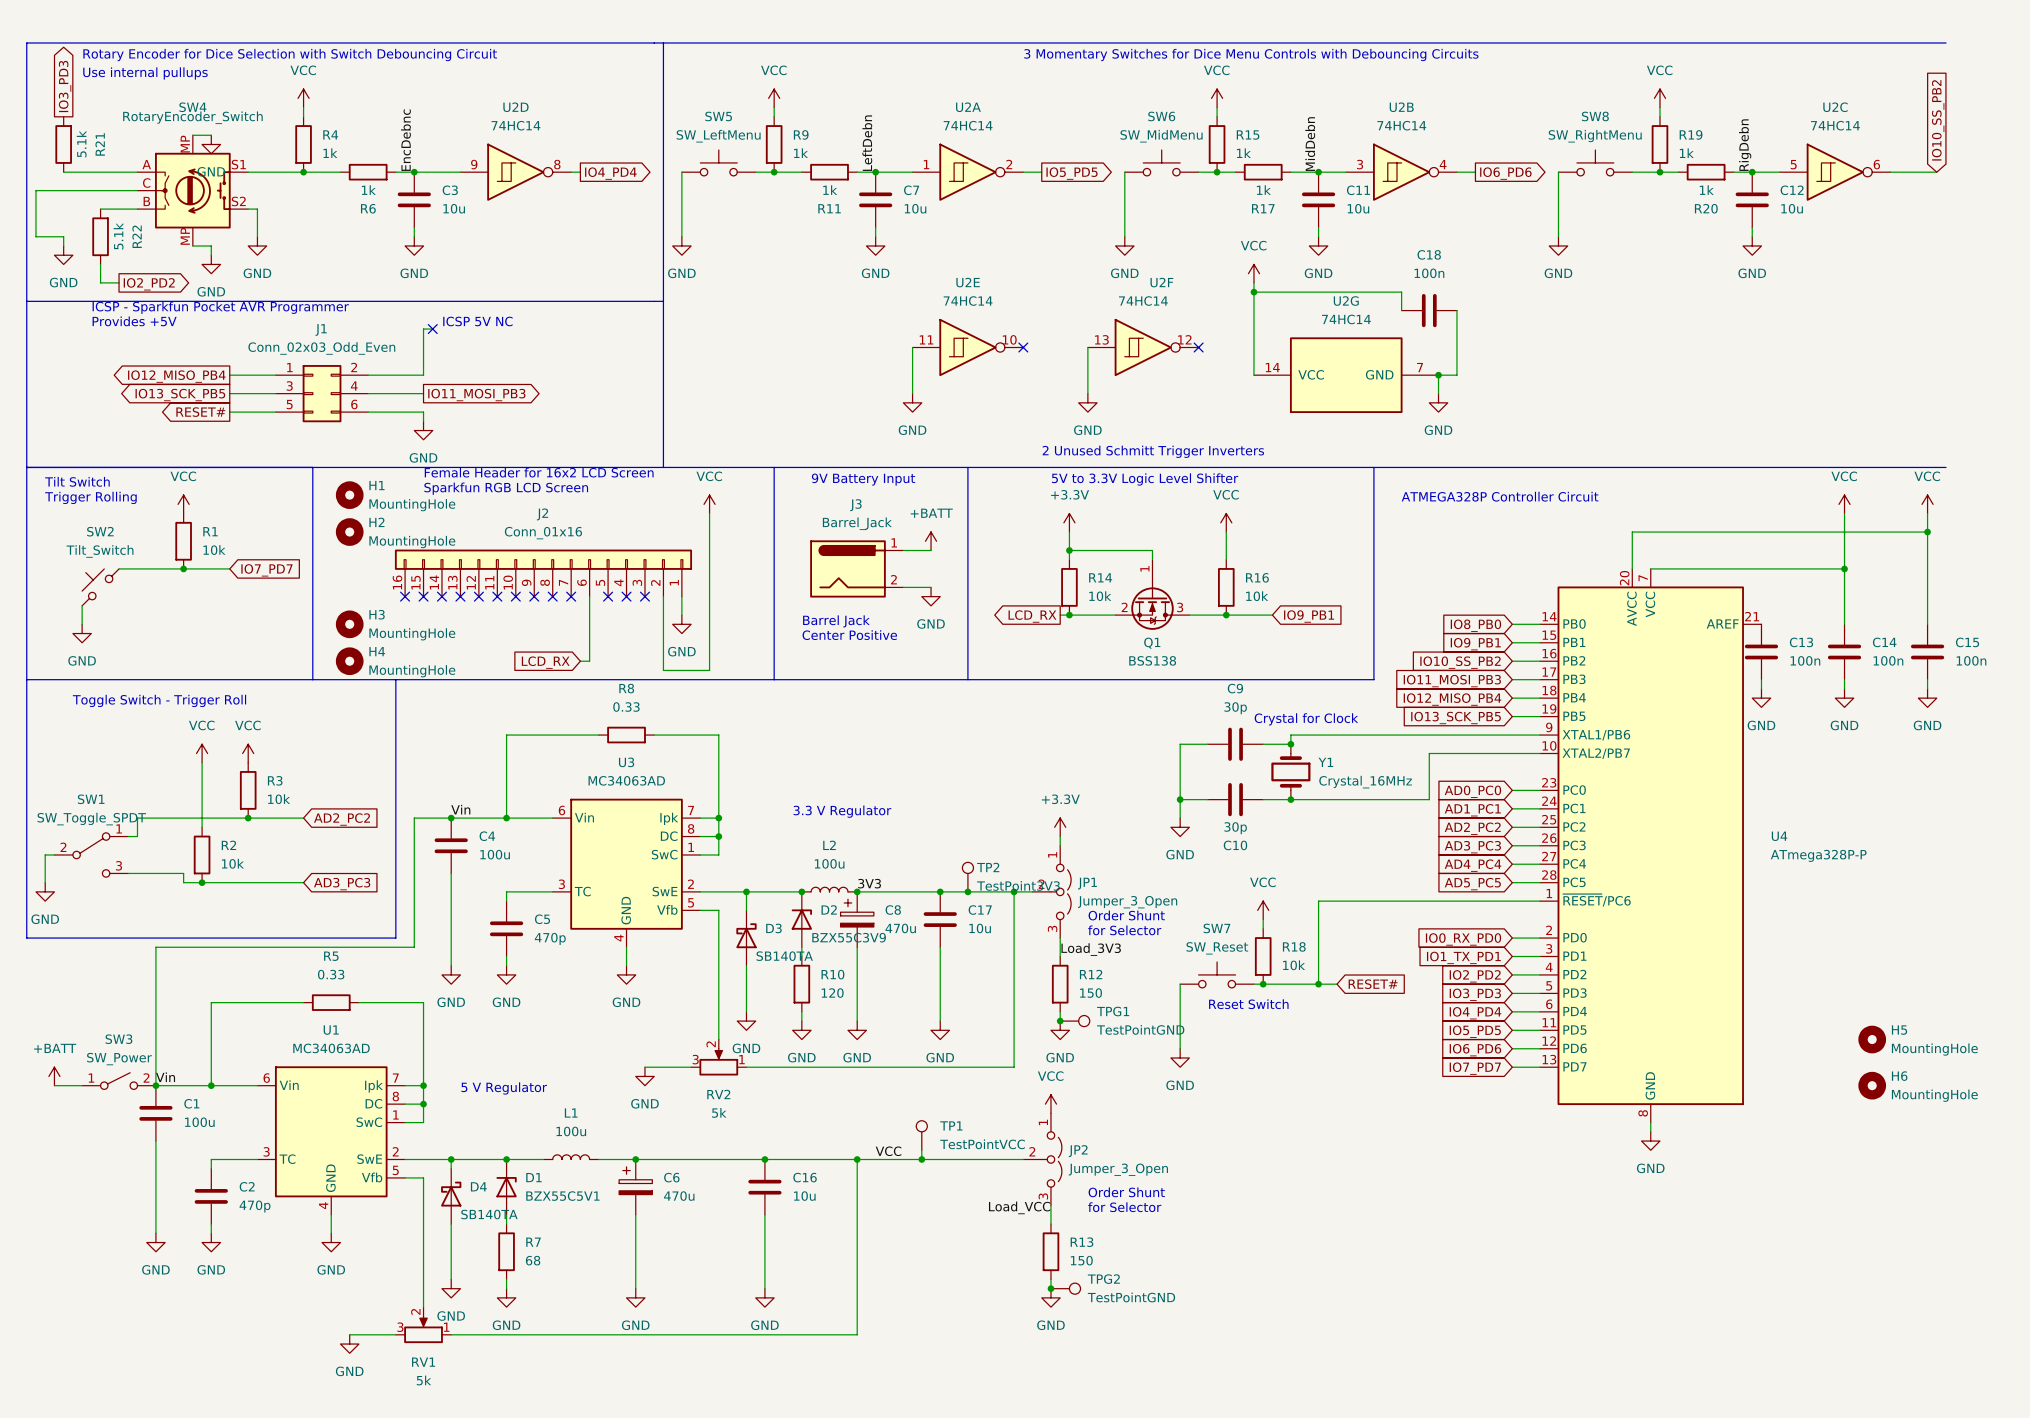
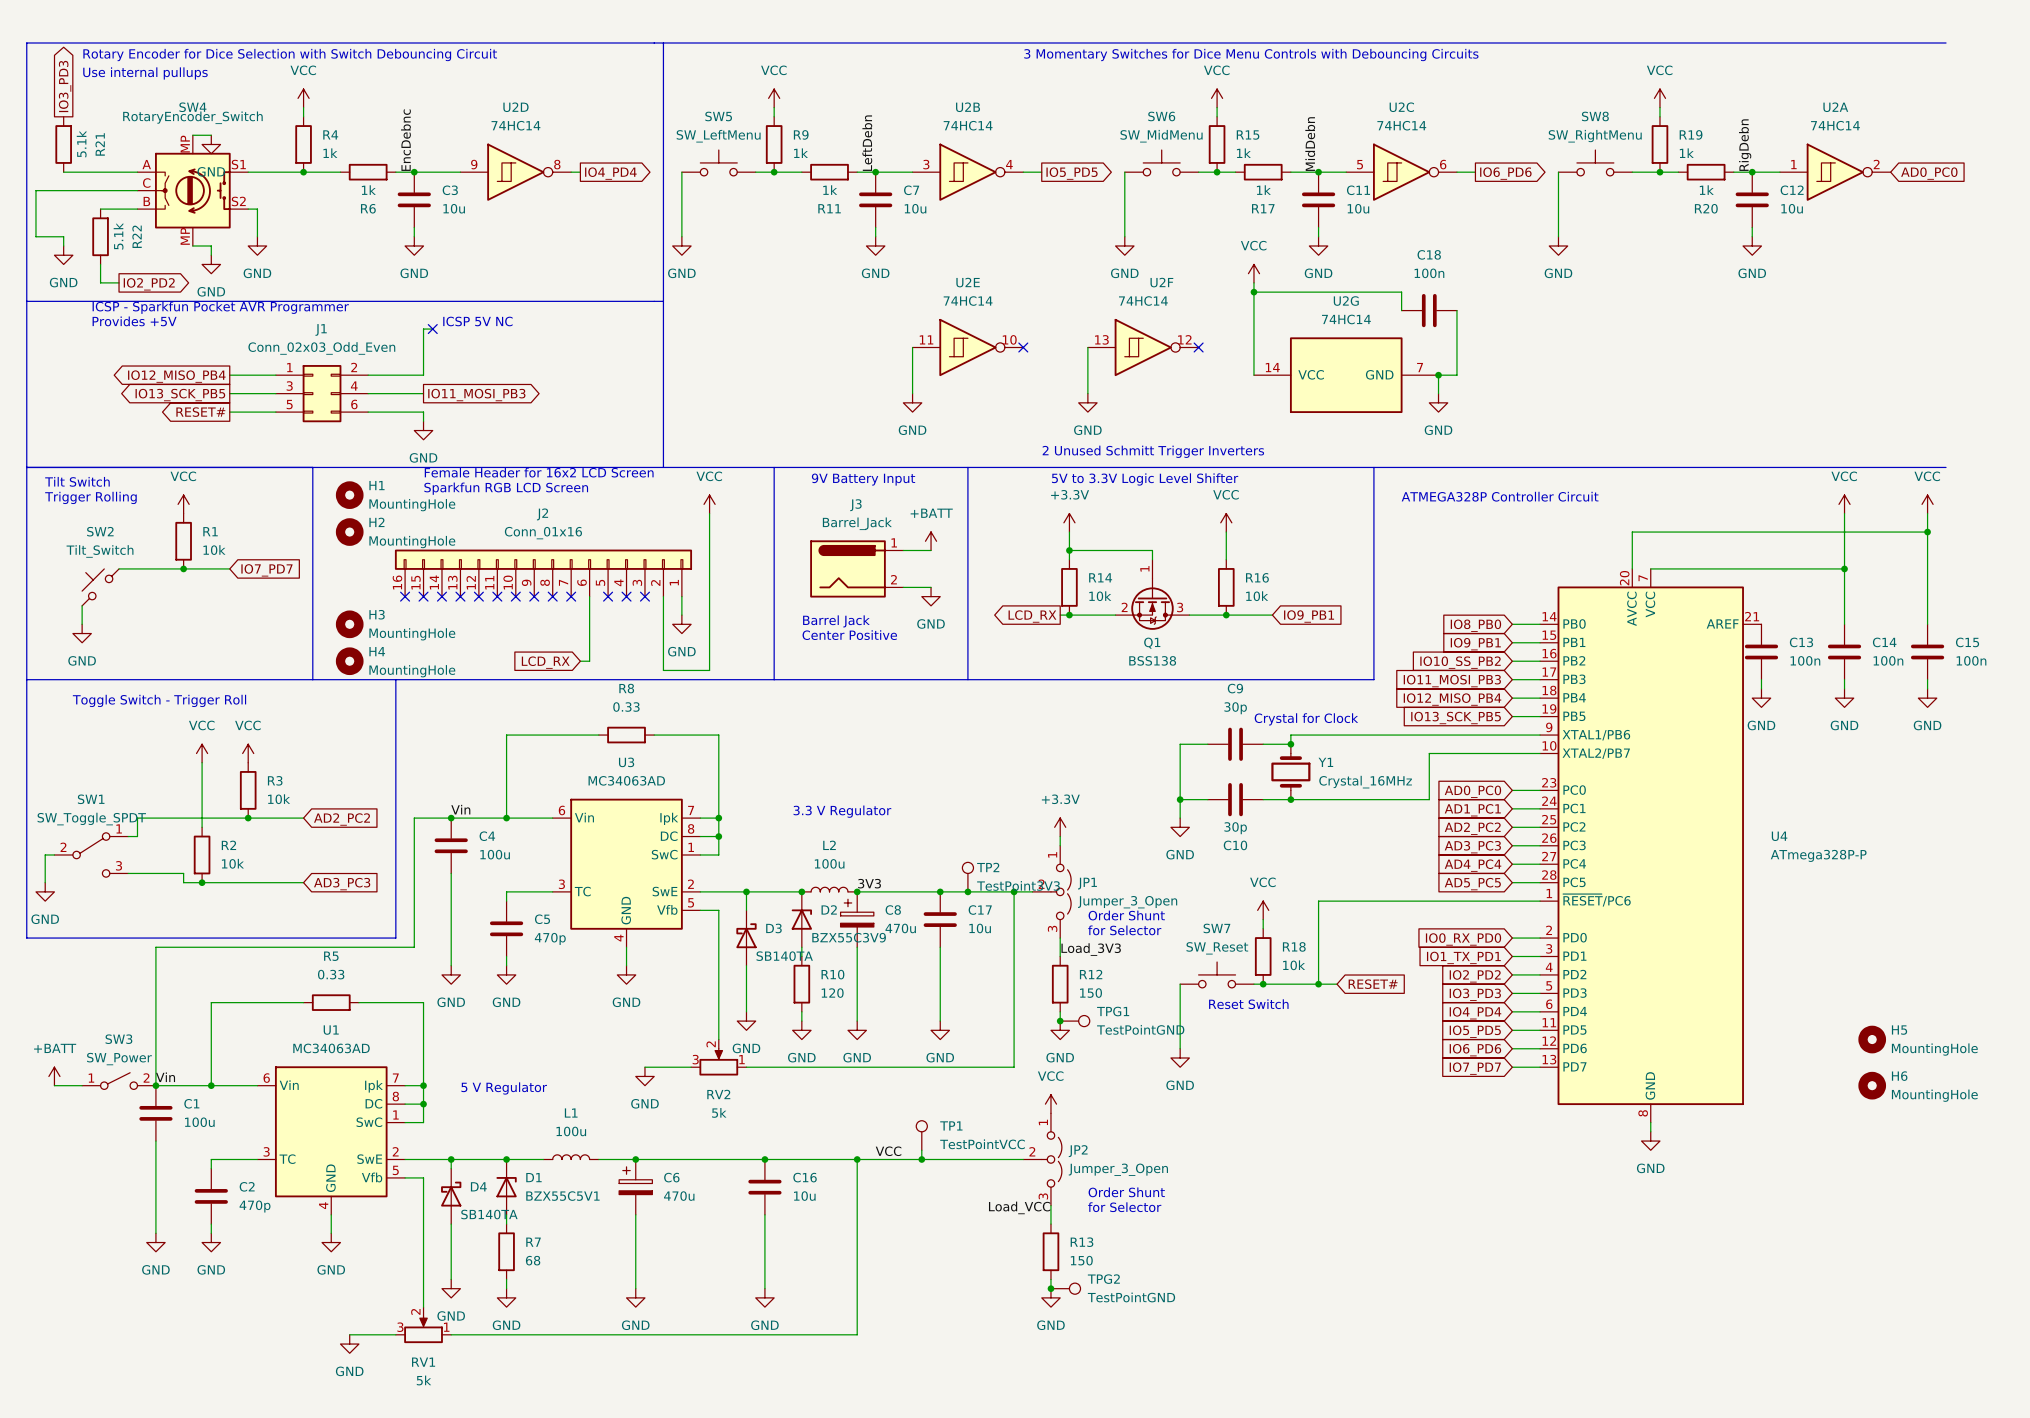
global label: IO10_SS_PB2 (1938, 120) -> none
U2A position: (967, 172) -> (1835, 172)
U2B position: (1401, 172) -> (967, 172)
U2C position: (1835, 172) -> (1401, 172)
wire: (1890, 172) (1936, 172) -> none
global label: none -> AD0_PC0 (1929, 173)

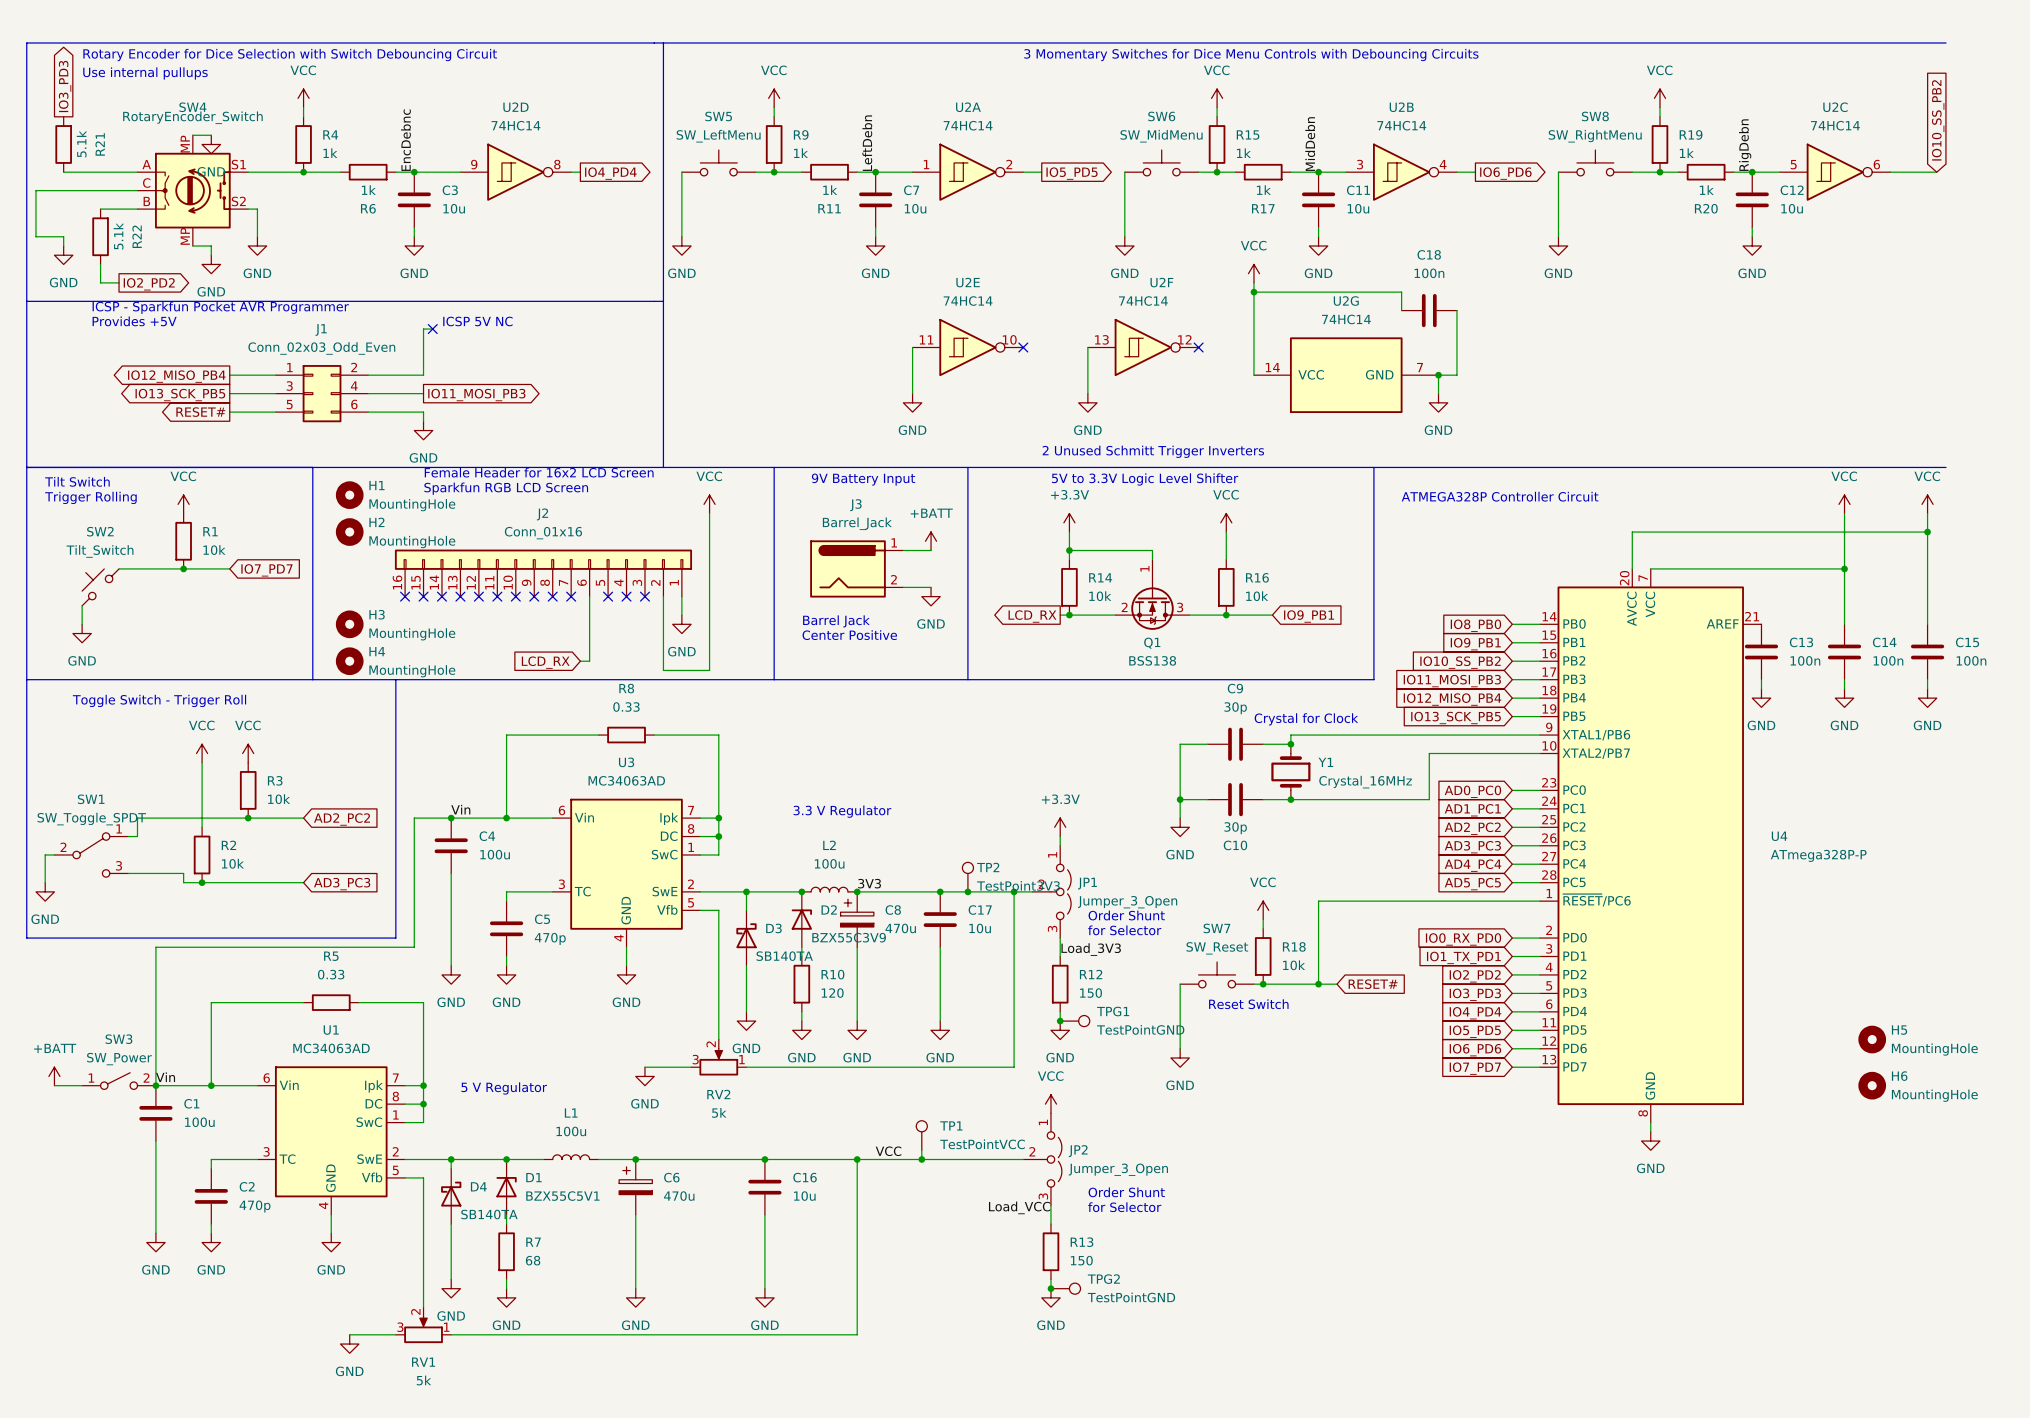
global label: none -> IO10_SS_PB2 (1938, 120)
U2B position: (967, 172) -> (1401, 172)
U2C position: (1401, 172) -> (1835, 172)
U2A position: (1835, 172) -> (967, 172)
wire: none -> (1890, 172) (1936, 172)
global label: AD0_PC0 (1929, 173) -> none

